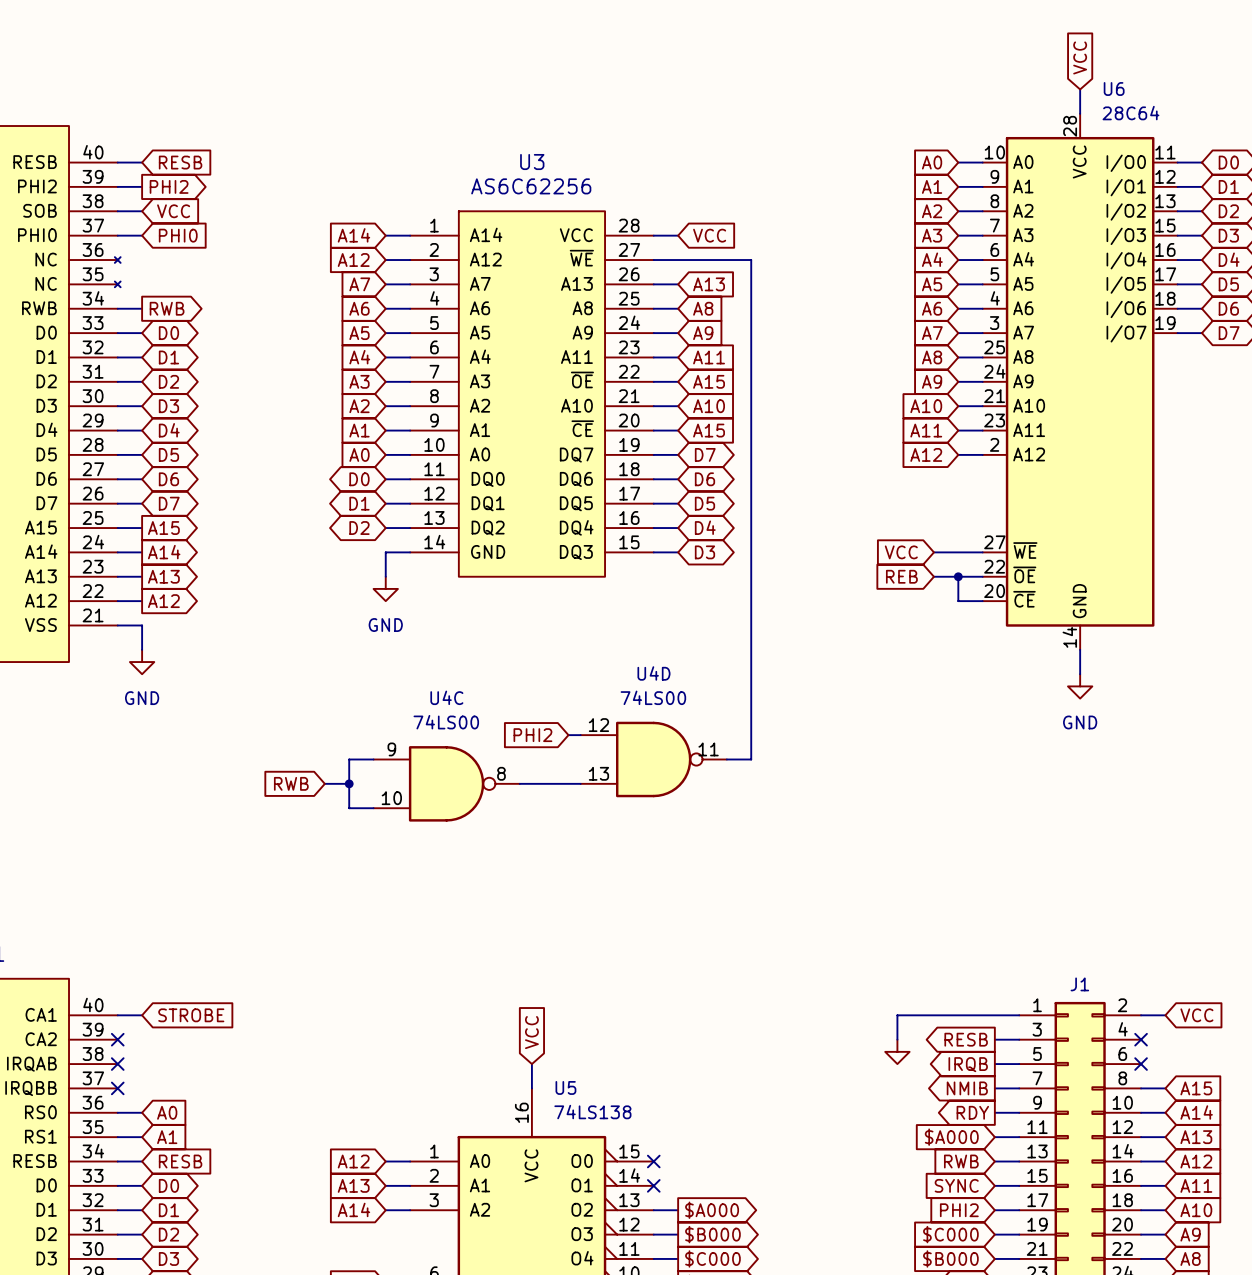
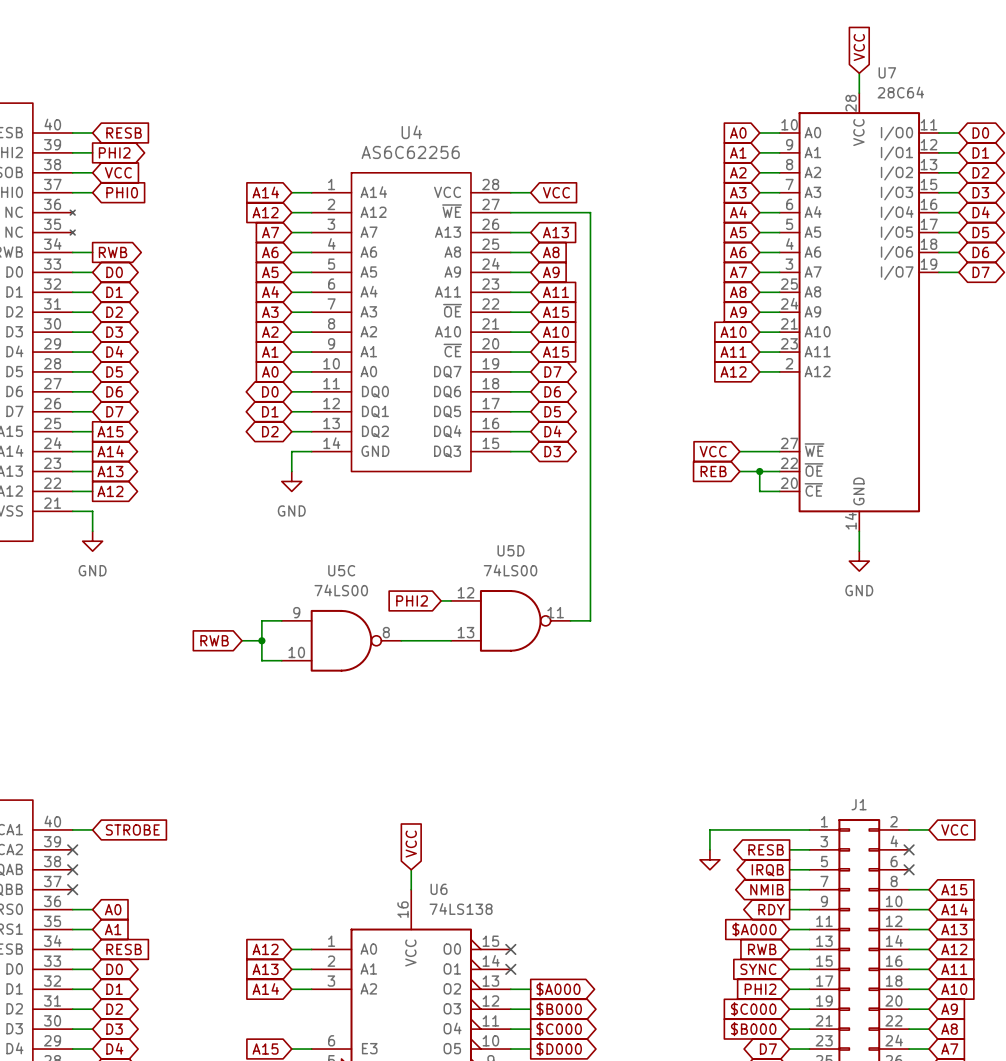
U6 name: U6 (1114, 89) -> U7 (887, 72)
U3 name: U3 (532, 162) -> U4 (411, 132)
U4D name: U4D (653, 673) -> U5D (510, 550)
U4C name: U4C (446, 697) -> U5C (341, 570)
U5 name: U5 (565, 1087) -> U6 (439, 889)

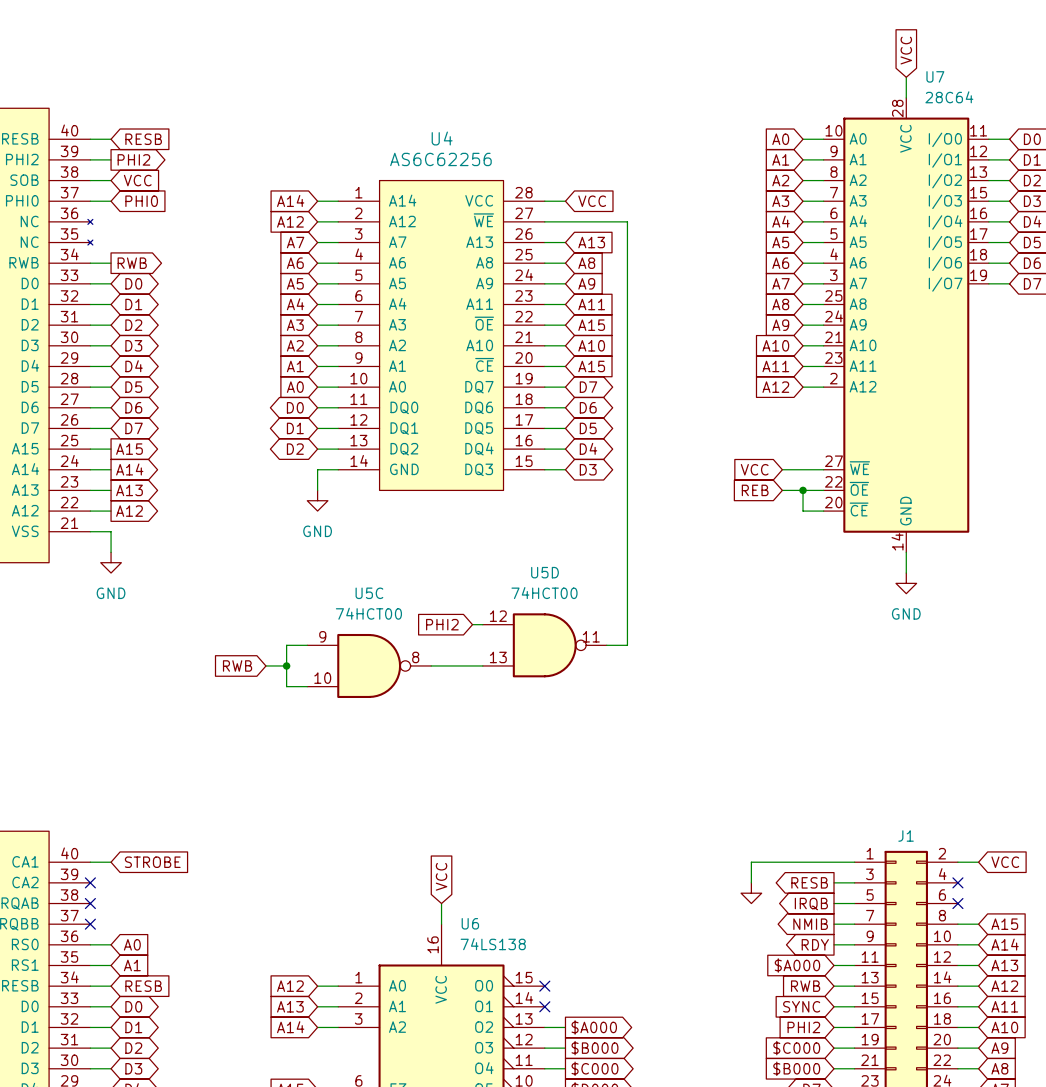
U5D value: 74LS00 (510, 570) -> 74HCT00 (544, 593)
U5C value: 74LS00 (341, 590) -> 74HCT00 (368, 613)

